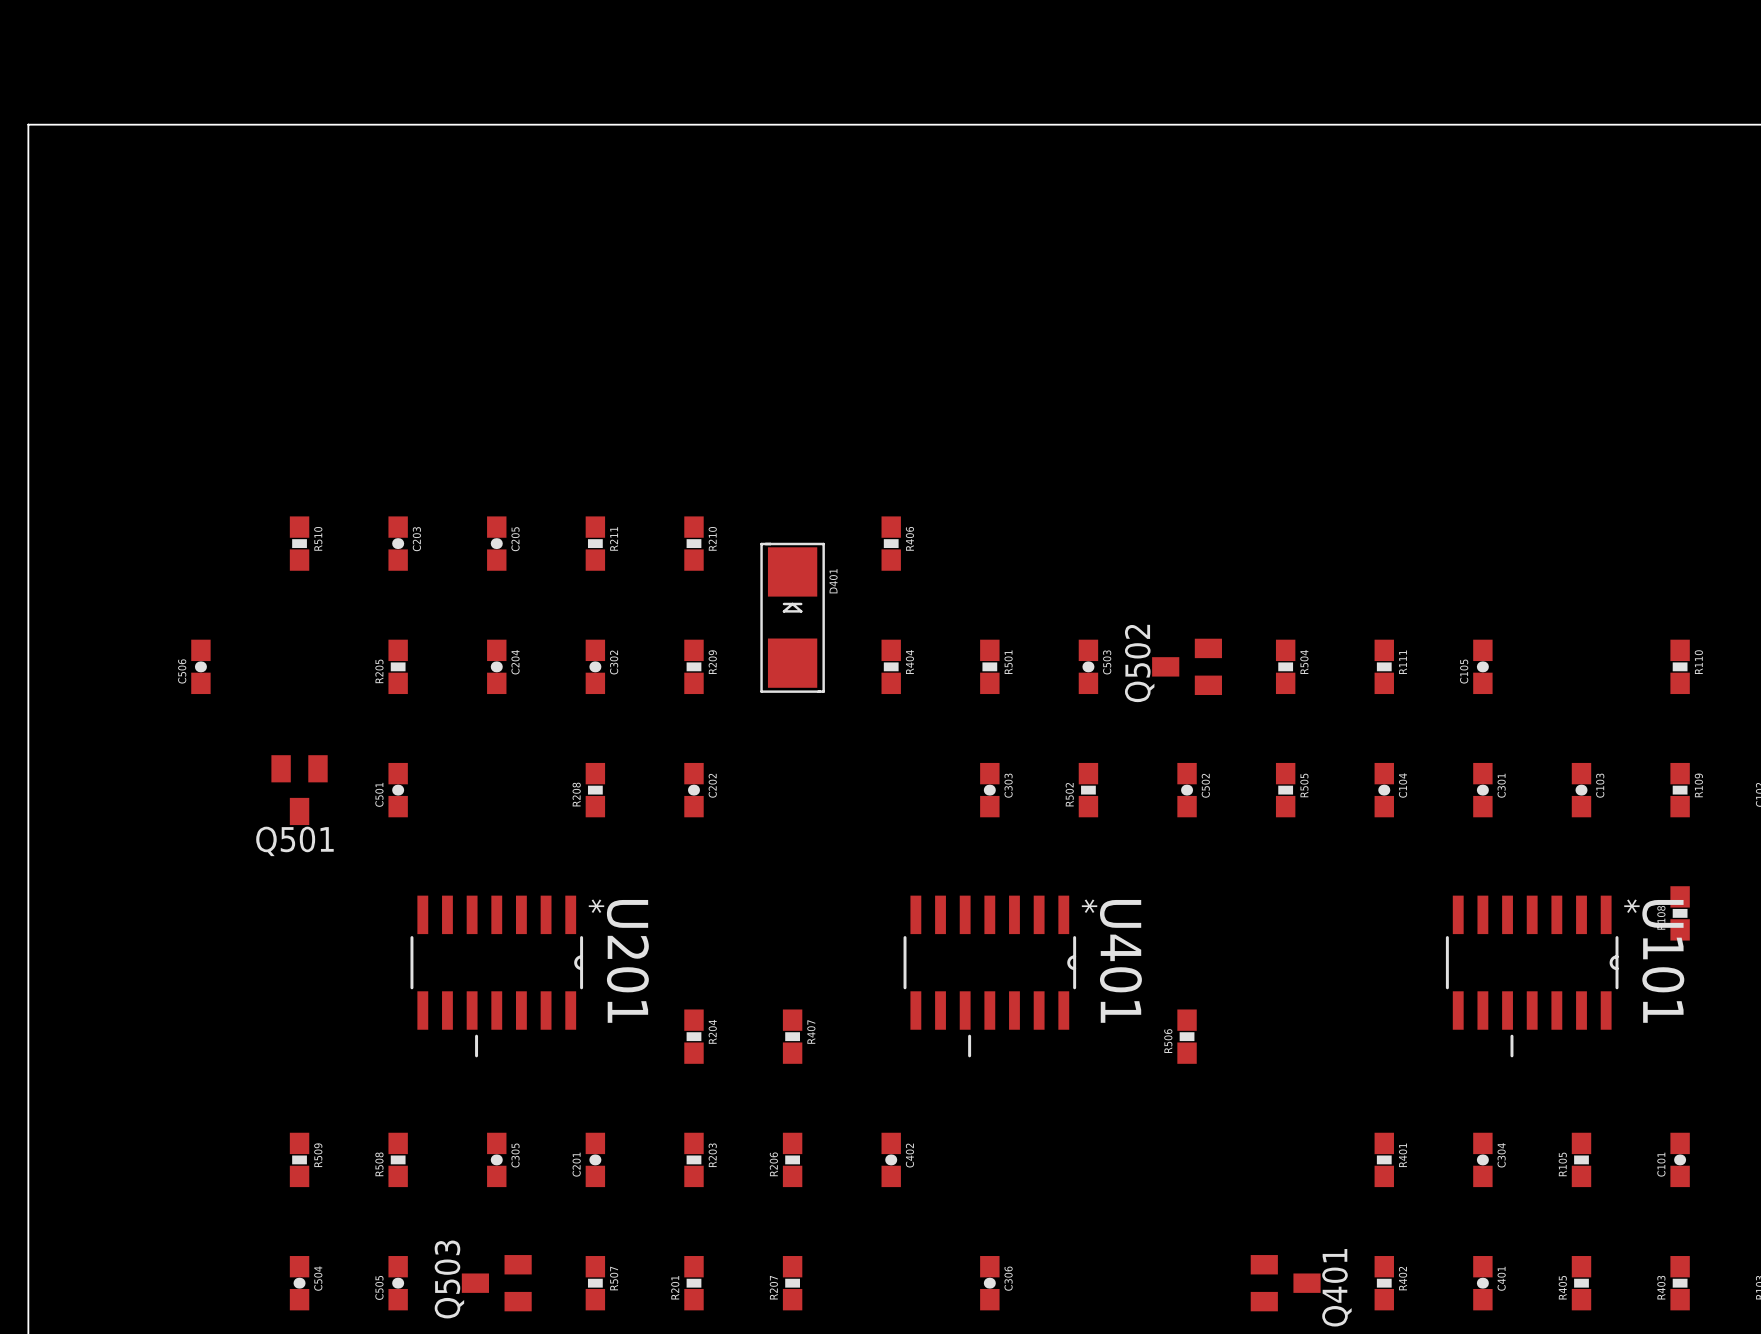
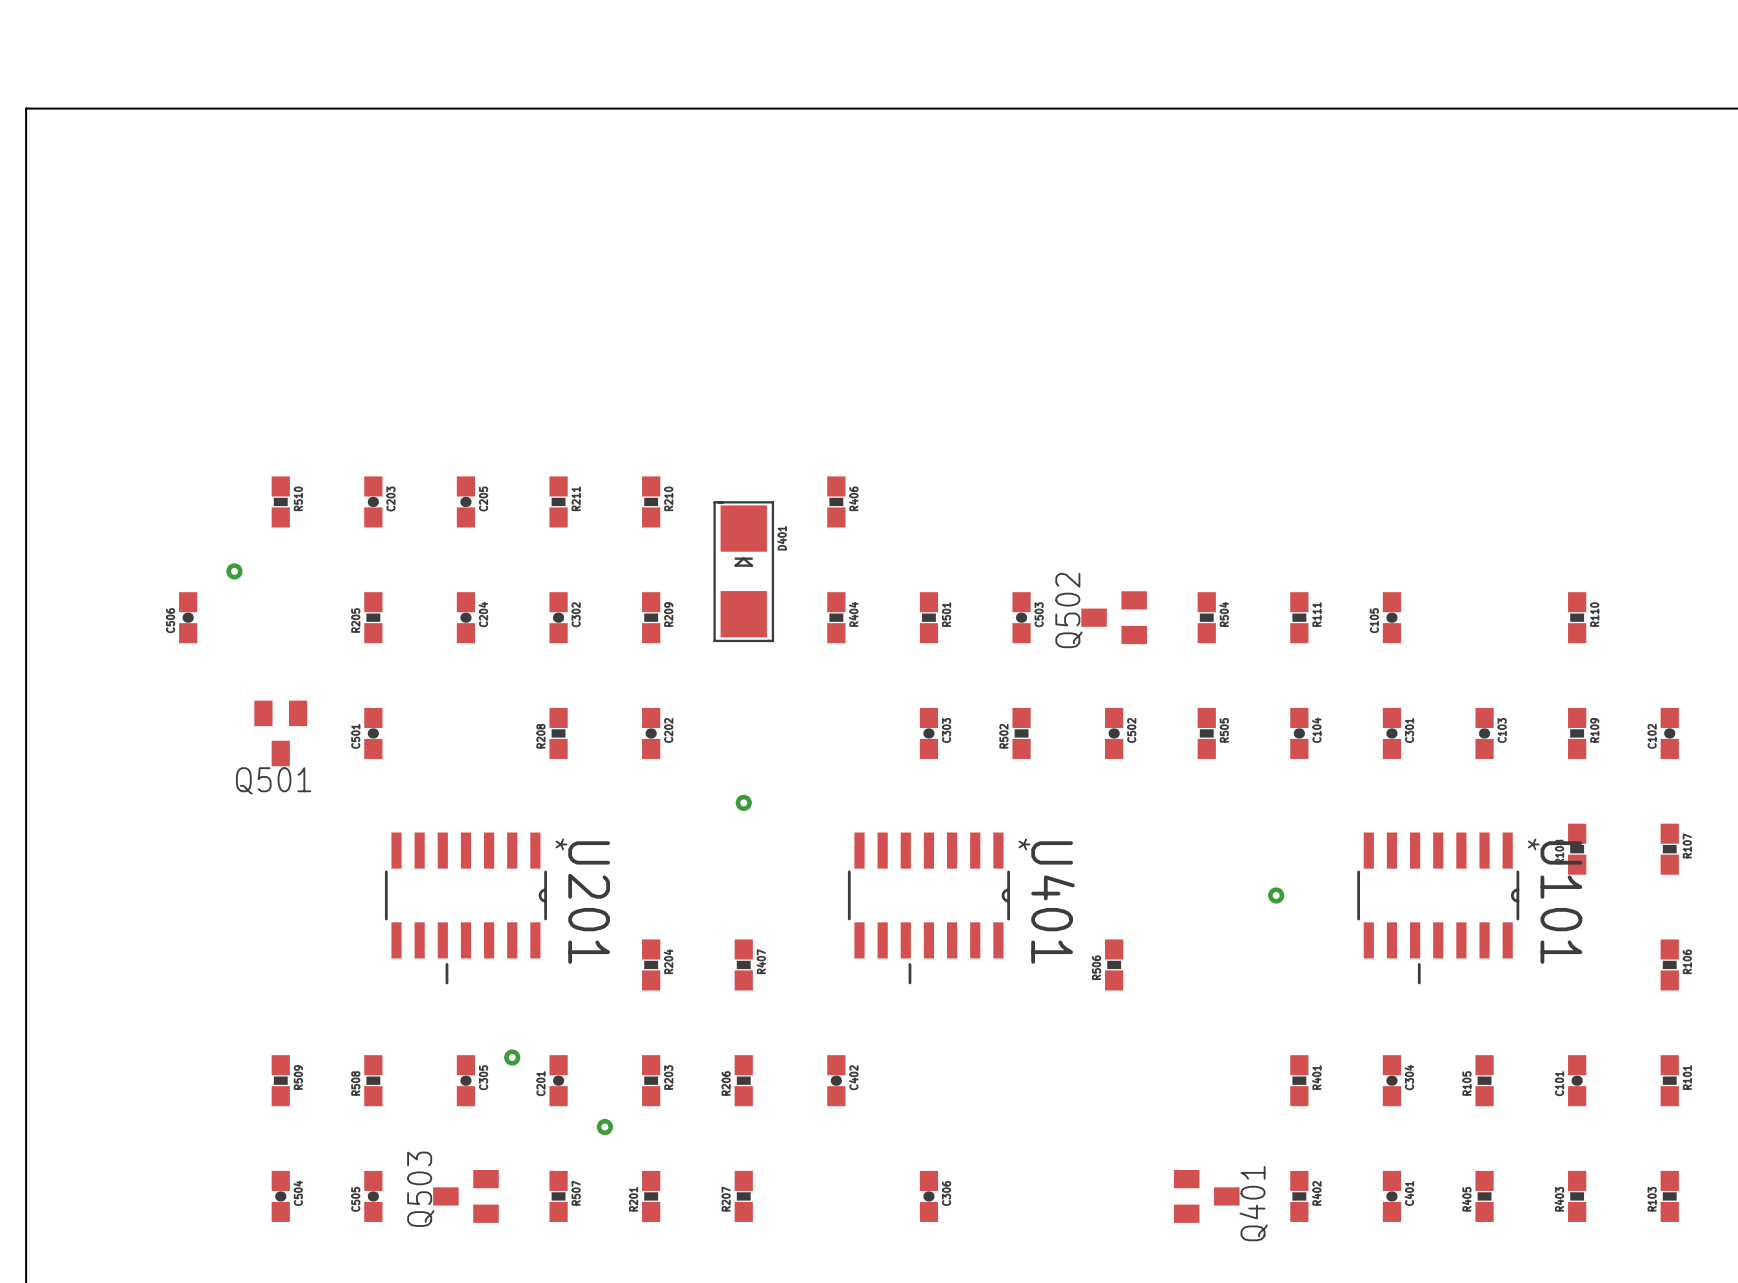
part: none -> (234, 571)
part: none -> (743, 802)
part: none -> (1276, 895)
part: none -> (512, 1057)
part: none -> (604, 1126)

